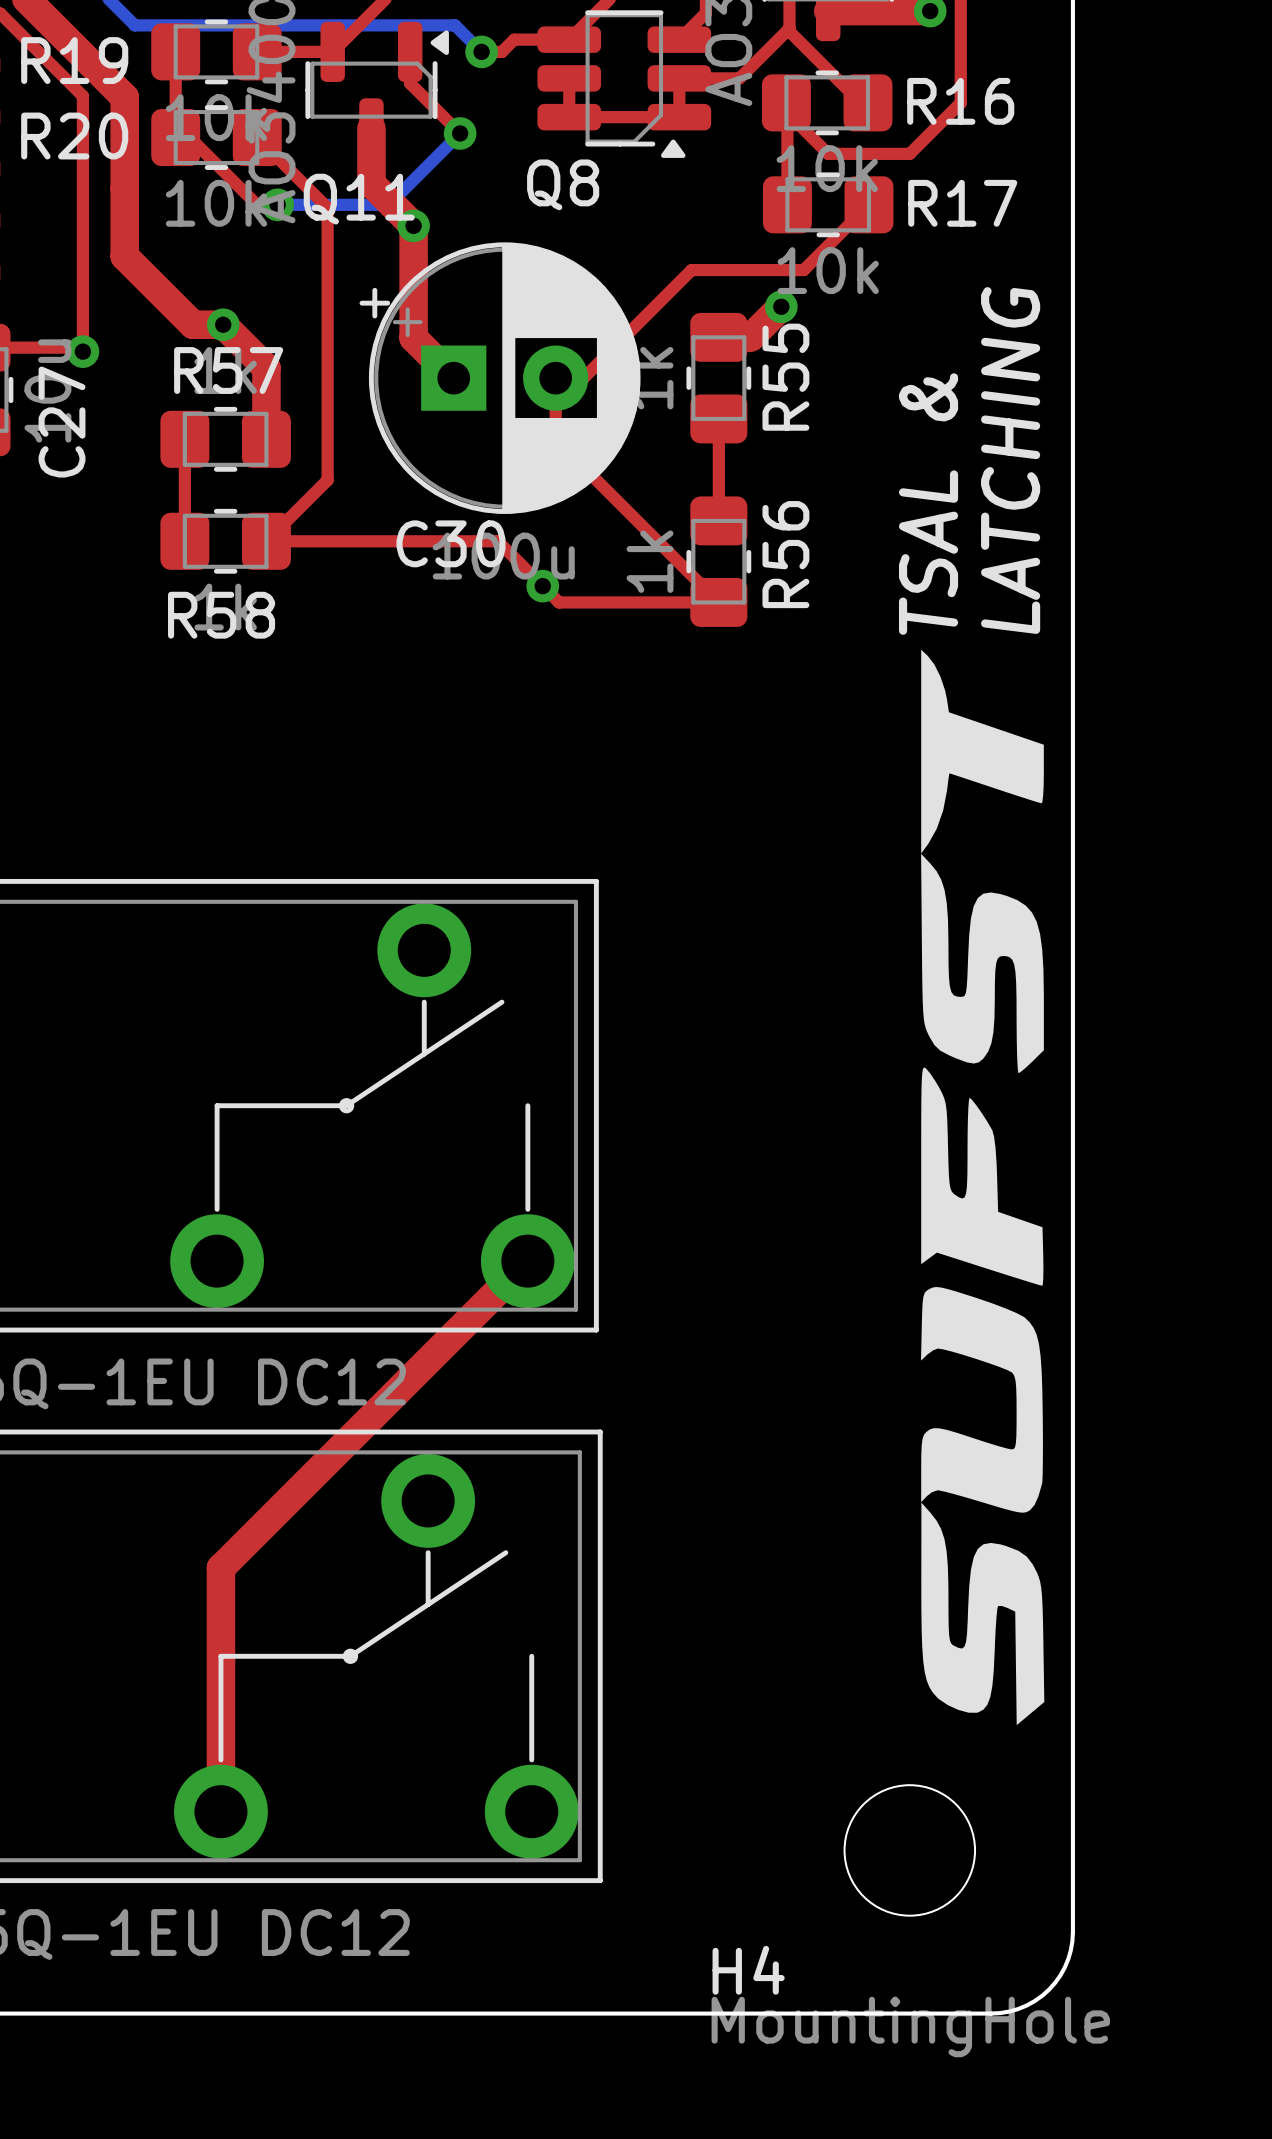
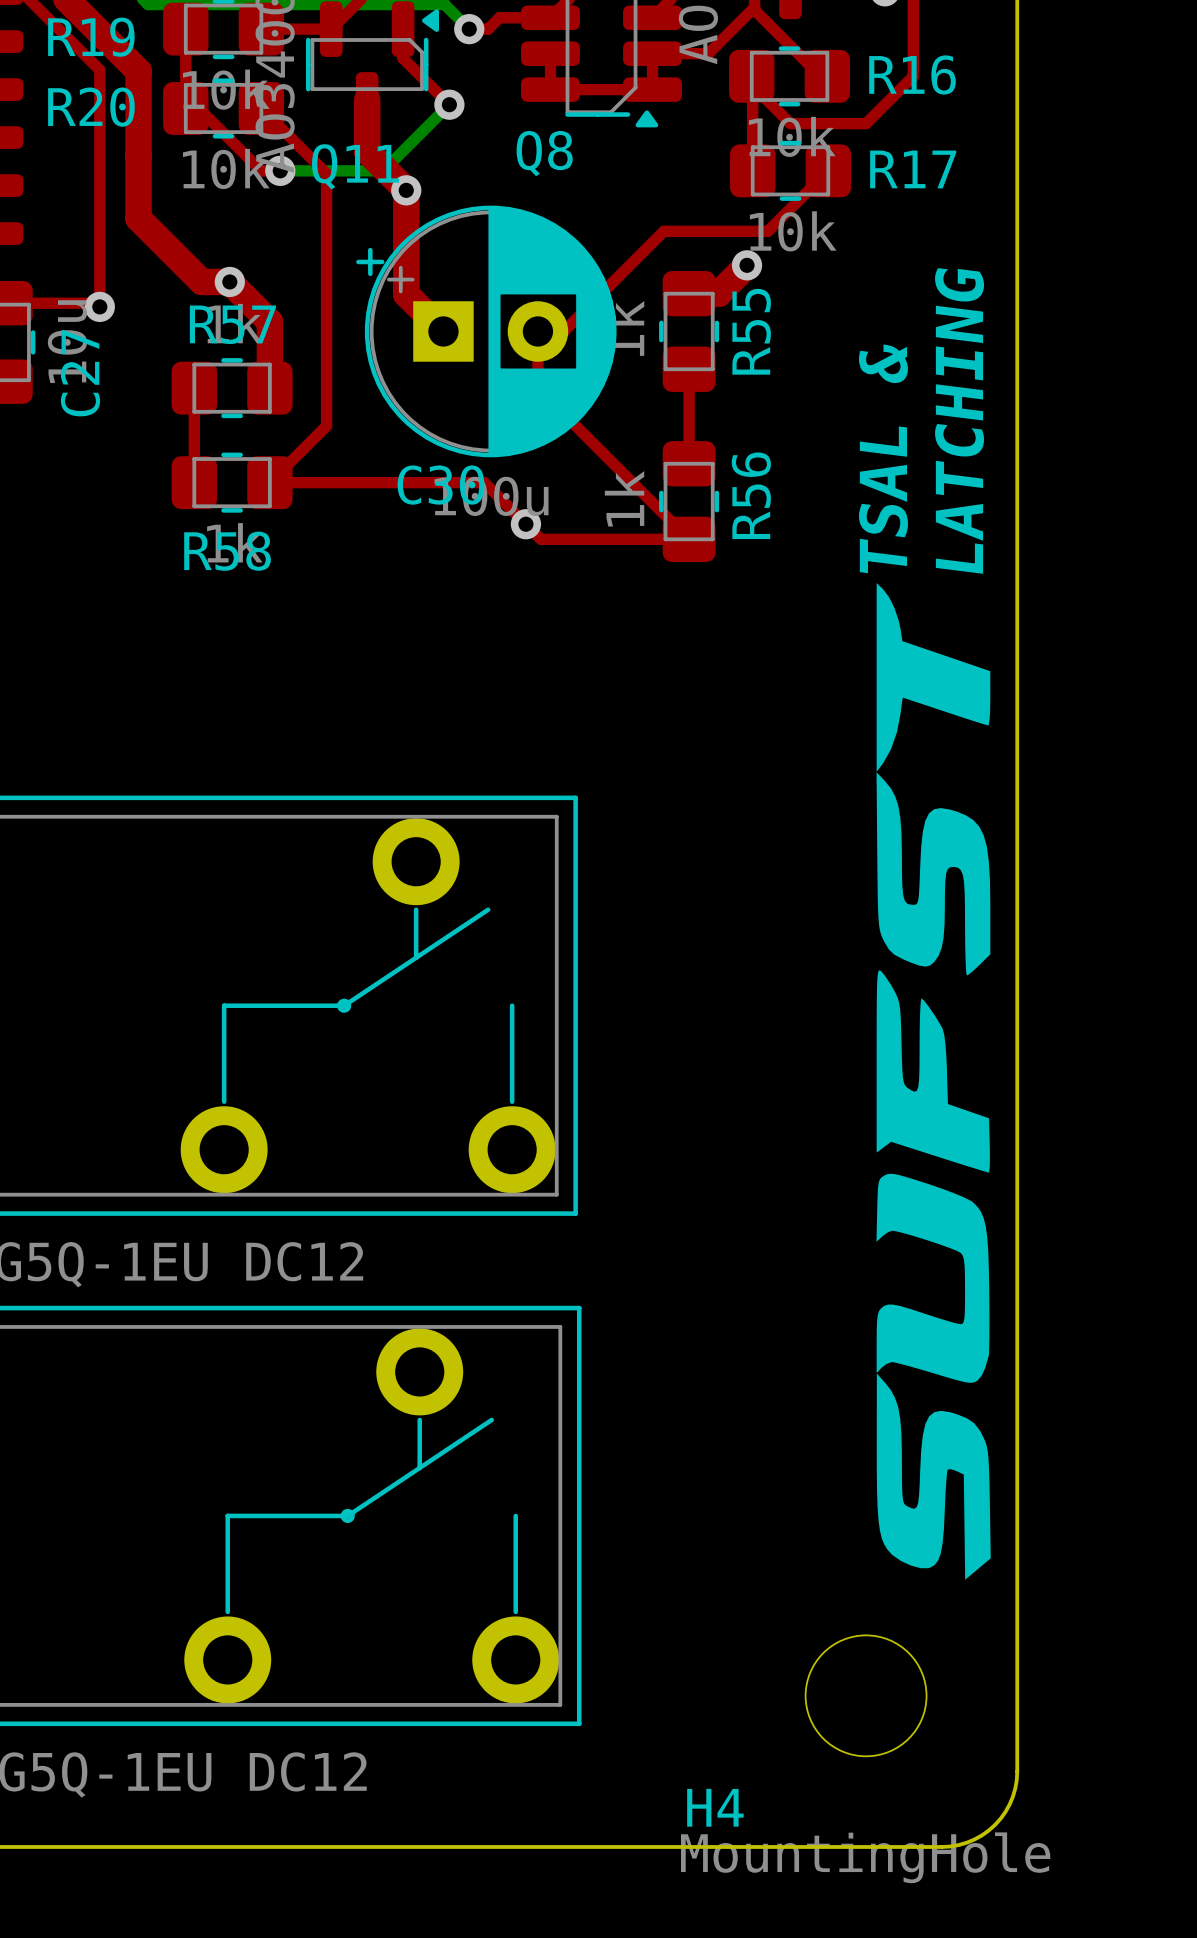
top track: (527, 1261) (220, 1568) (220, 1811) -> none

